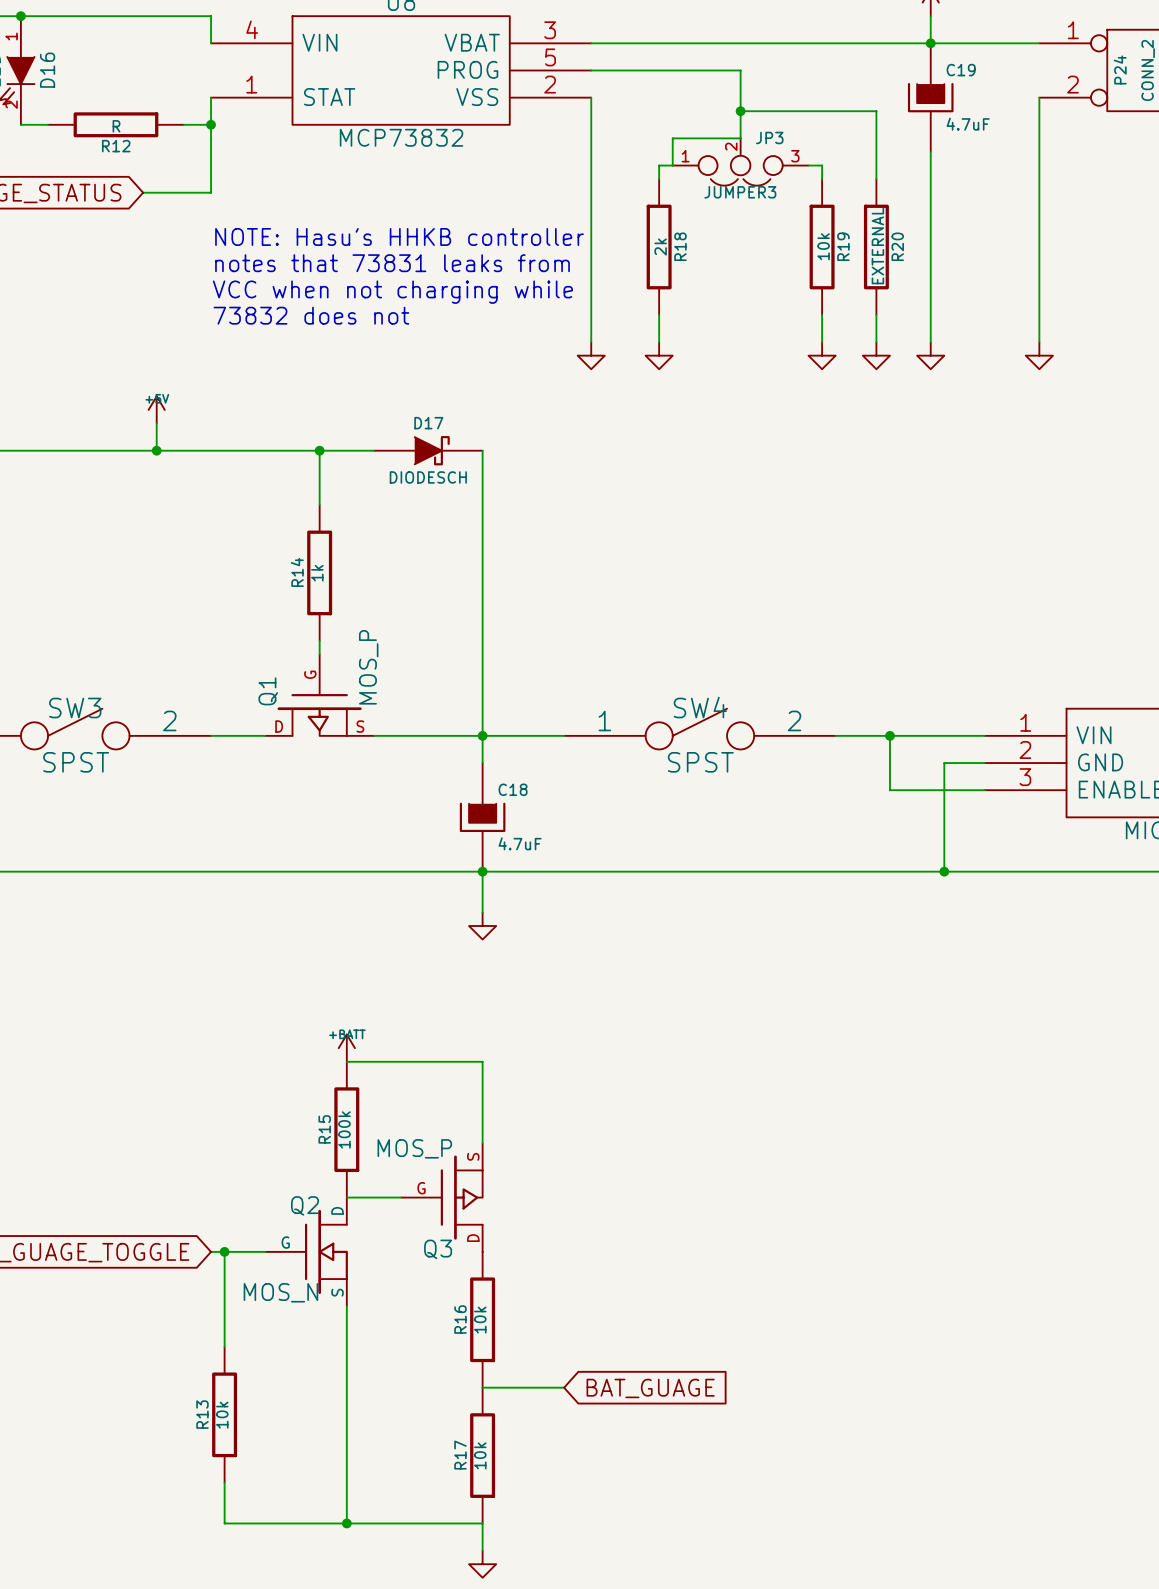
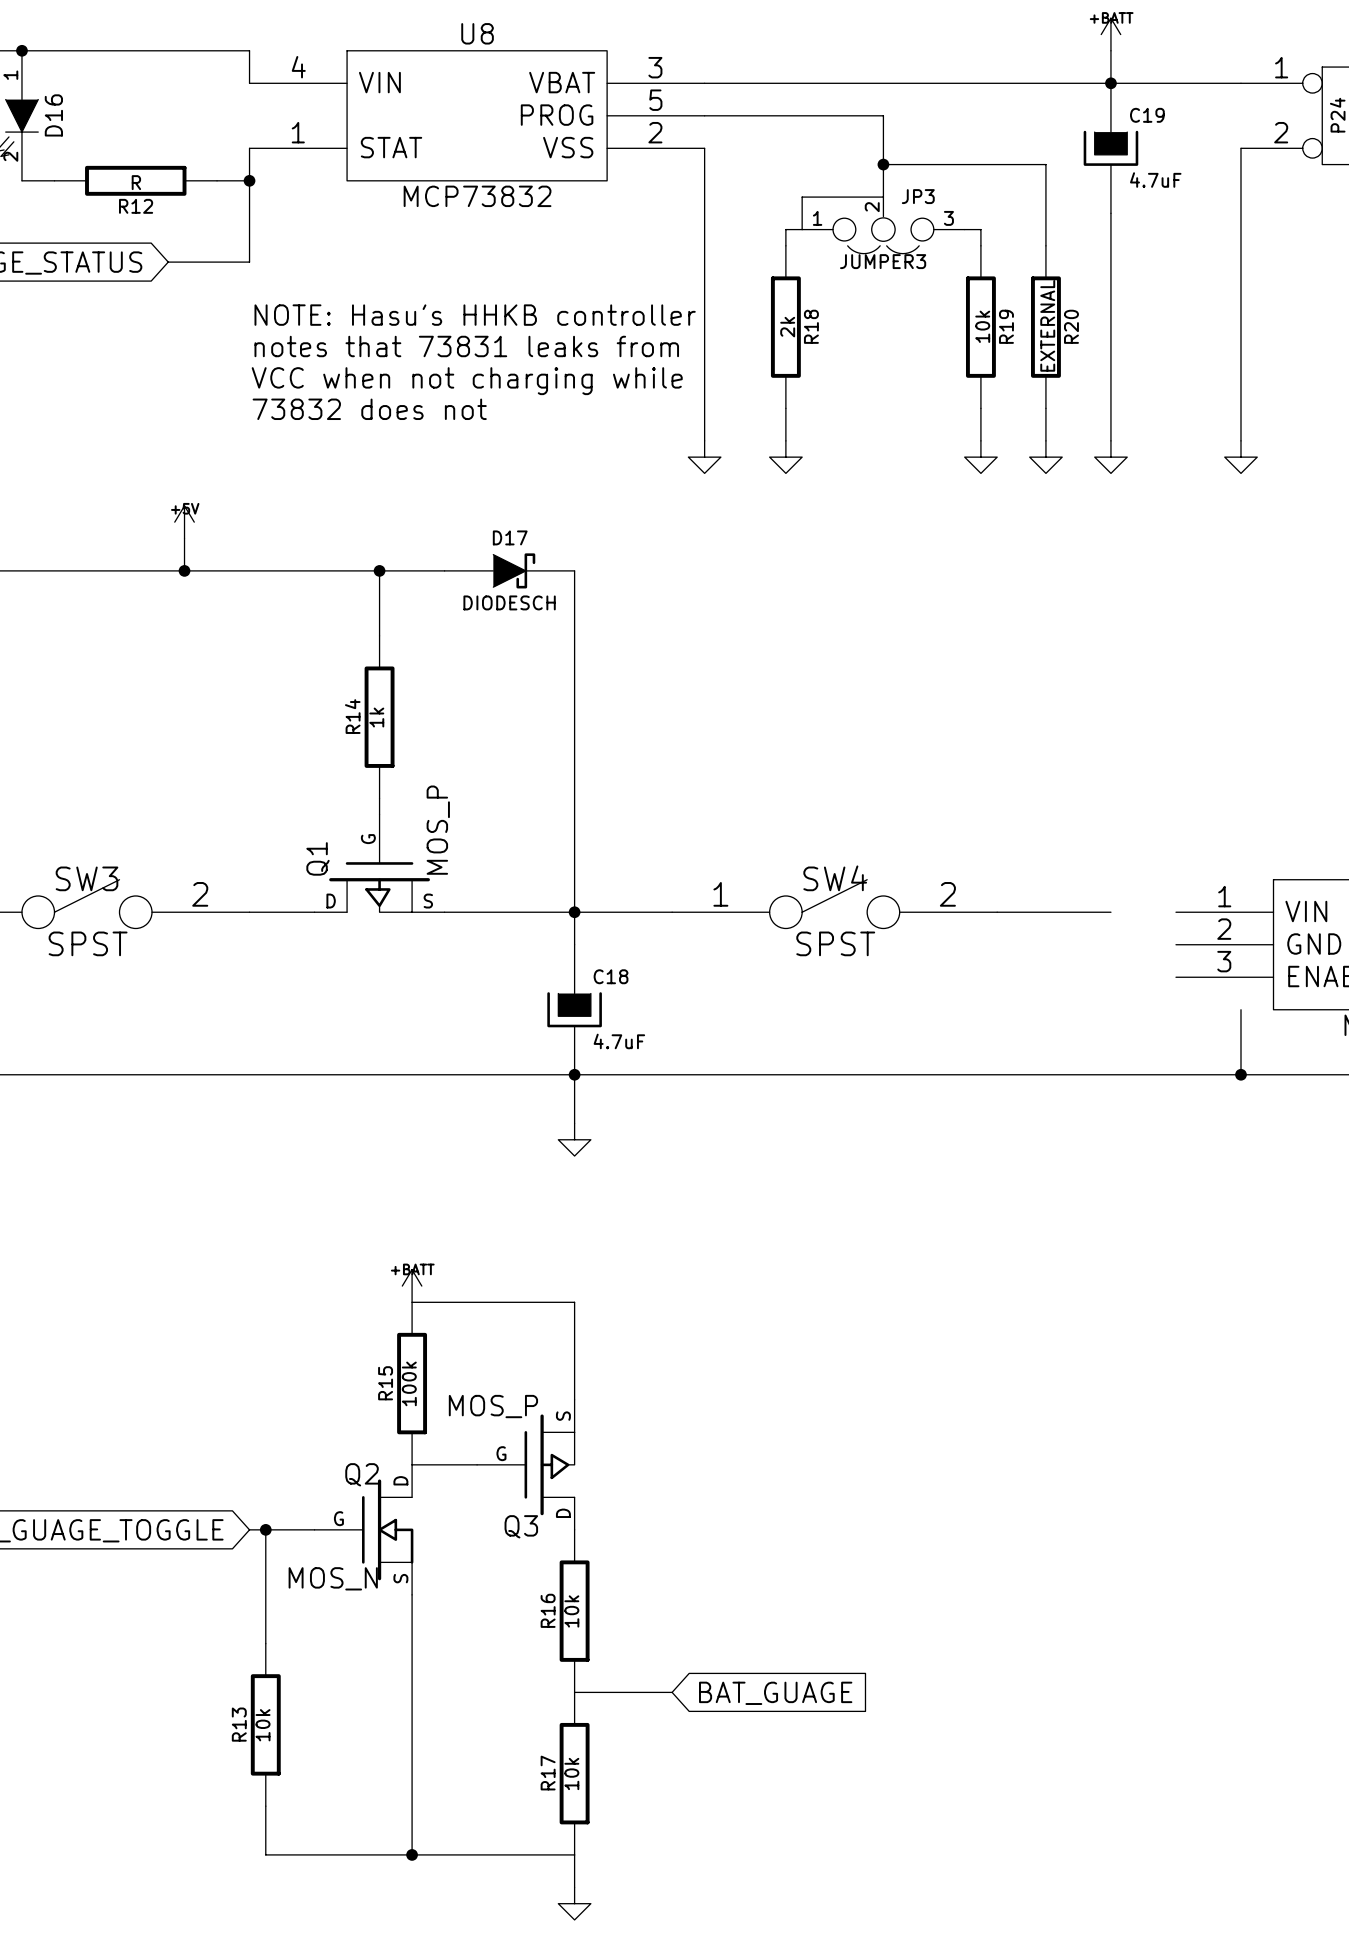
wire: (889, 735) (889, 790) (985, 790) -> none
junction: (889, 735) -> none
wire: (930, 735) (985, 735) -> none
wire: (985, 763) (944, 763) (944, 871) -> none
wire: none -> (1240, 1009) (1240, 1074)
junction: (944, 871) -> none
junction: none -> (1240, 1074)

